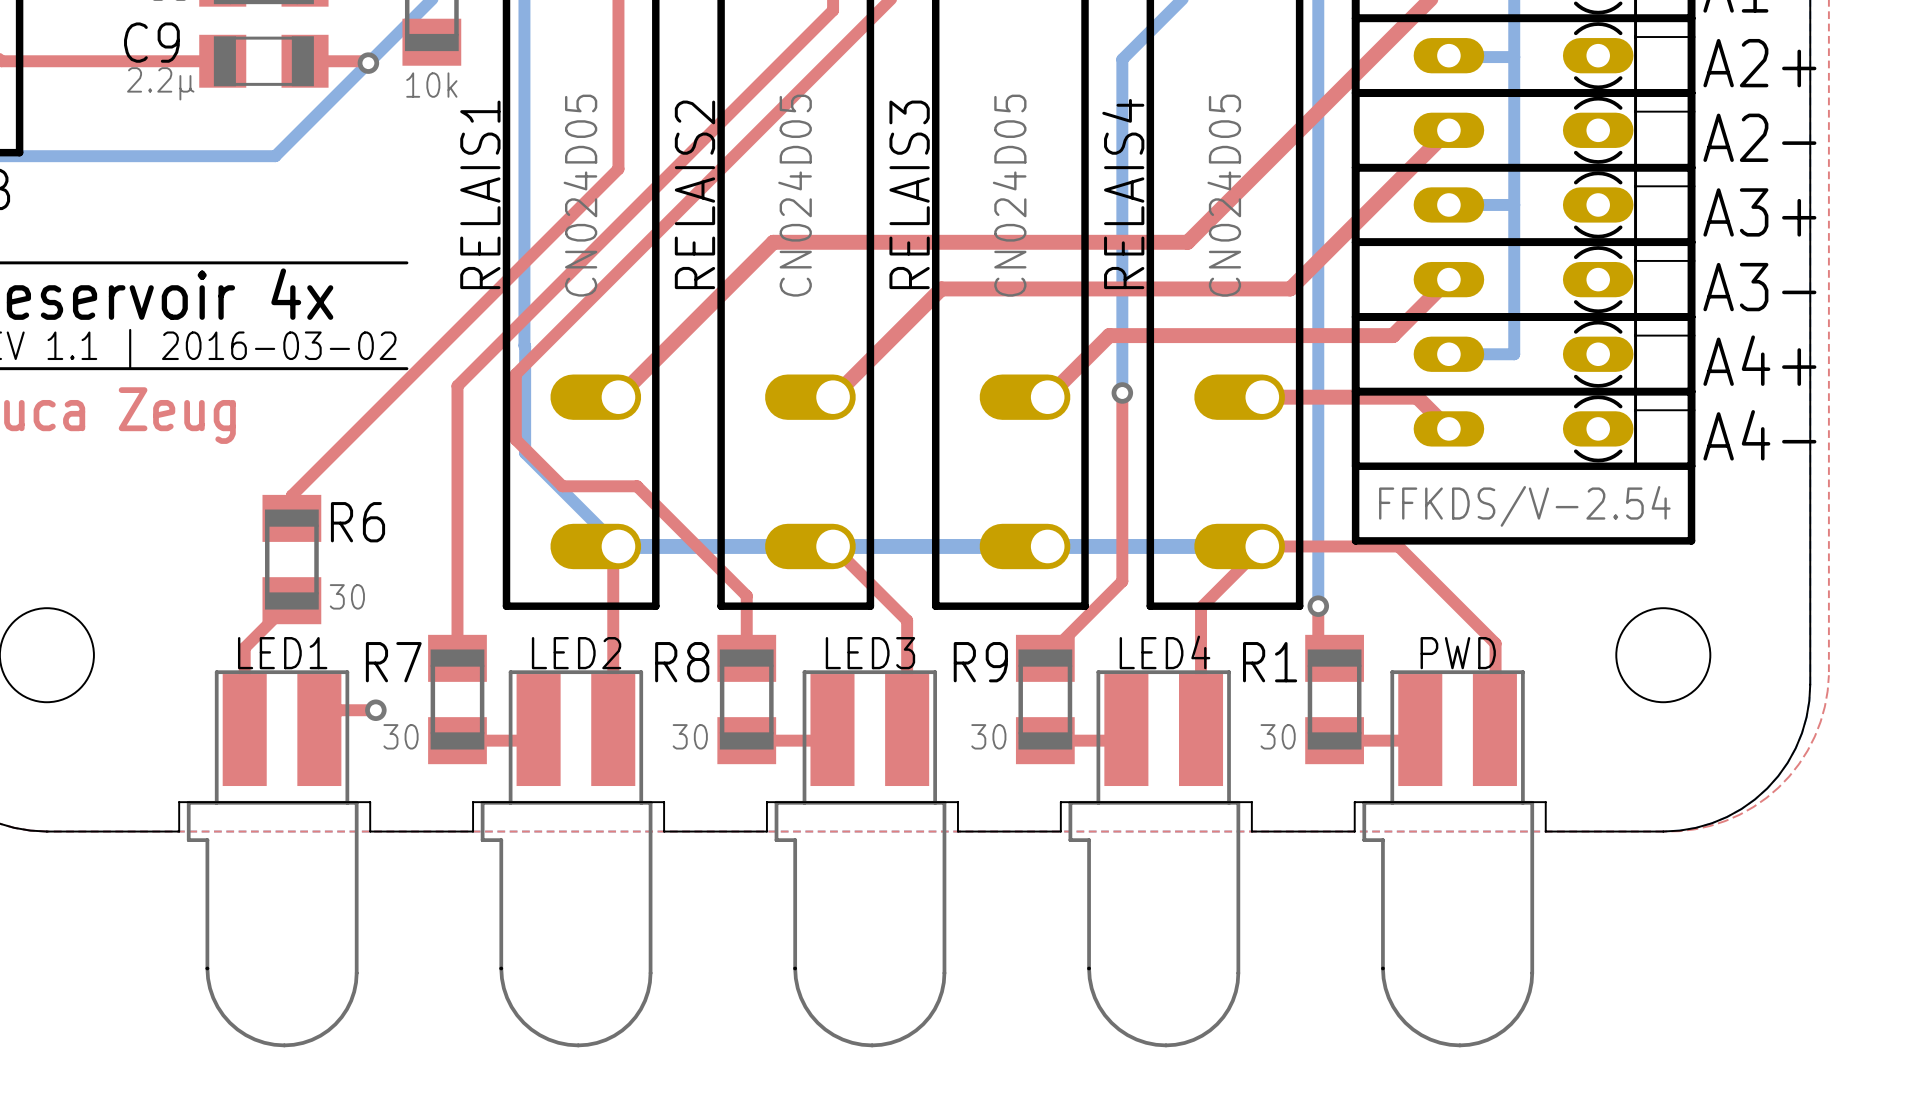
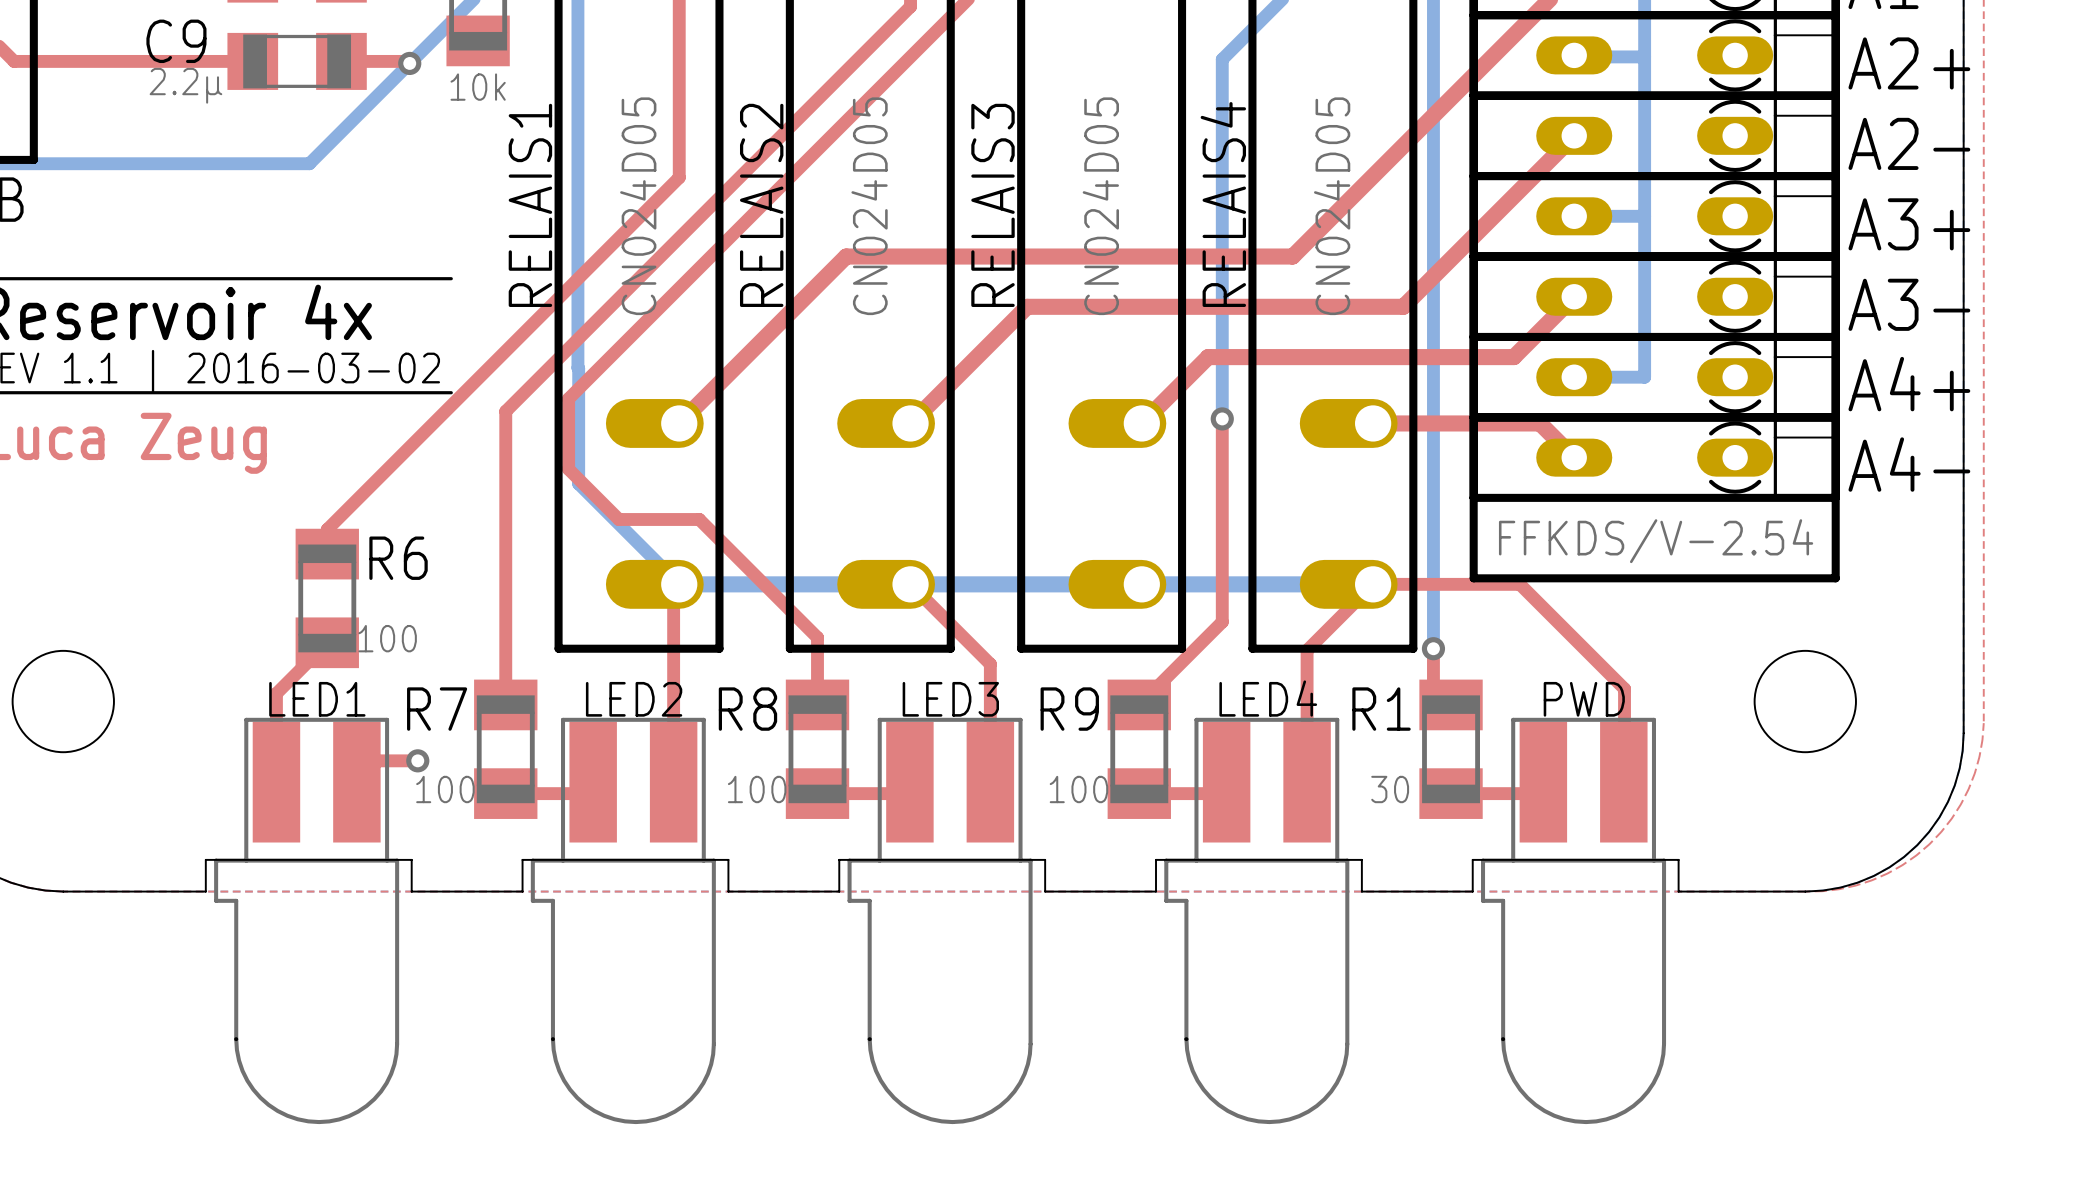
R6 value: 30 (347, 596) -> 100 (387, 638)
R7 value: 30 (401, 736) -> 100 (445, 789)
R8 value: 30 (690, 736) -> 100 (757, 789)
R9 value: 30 (988, 736) -> 100 (1078, 789)

